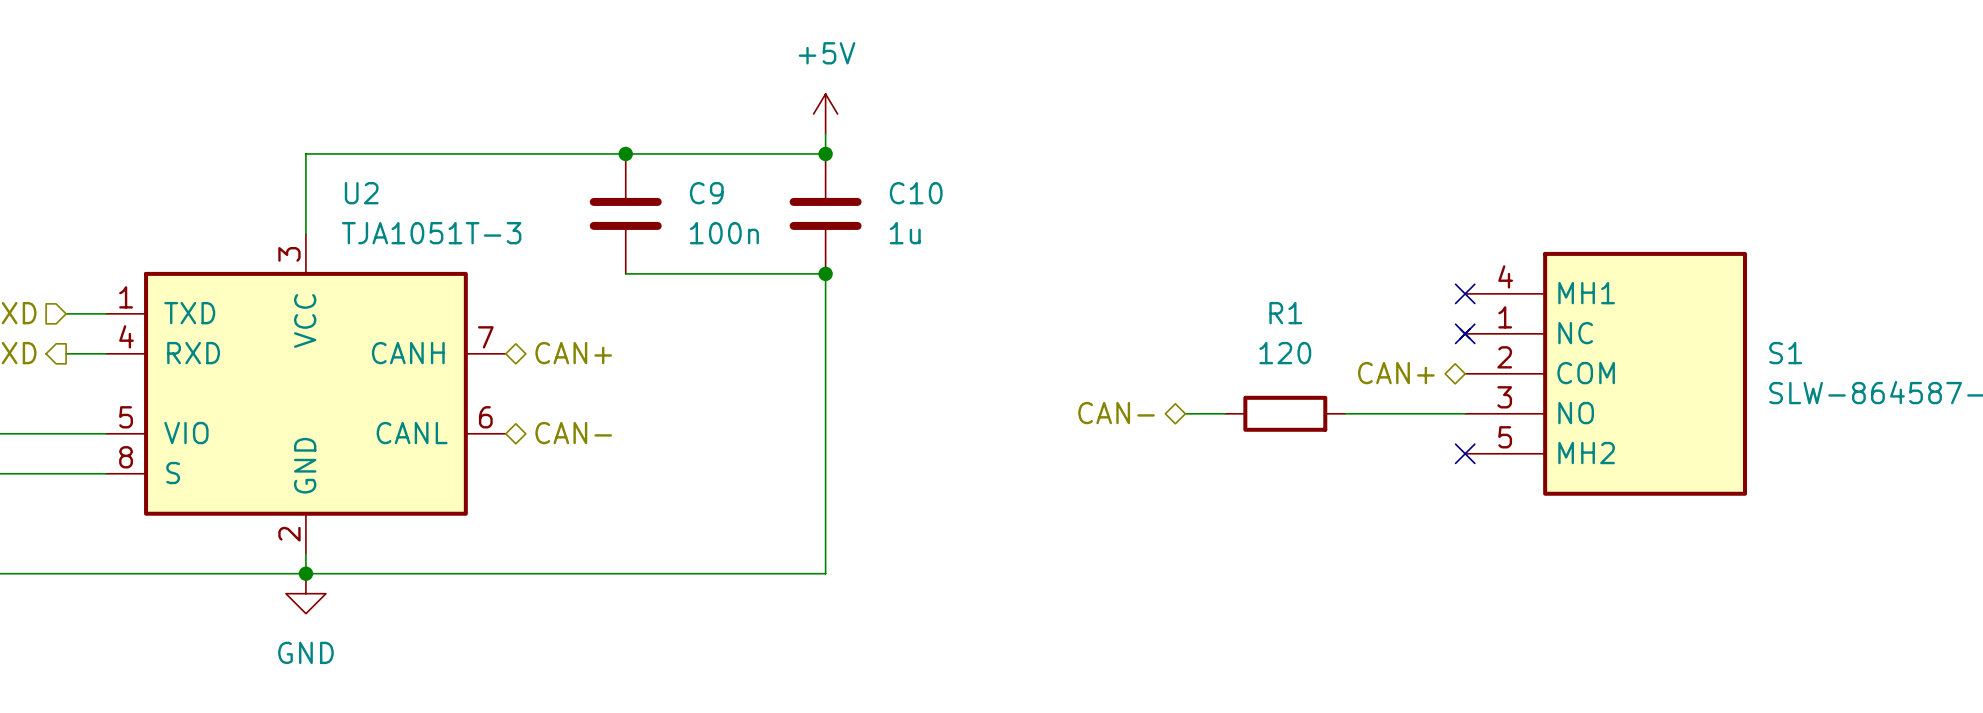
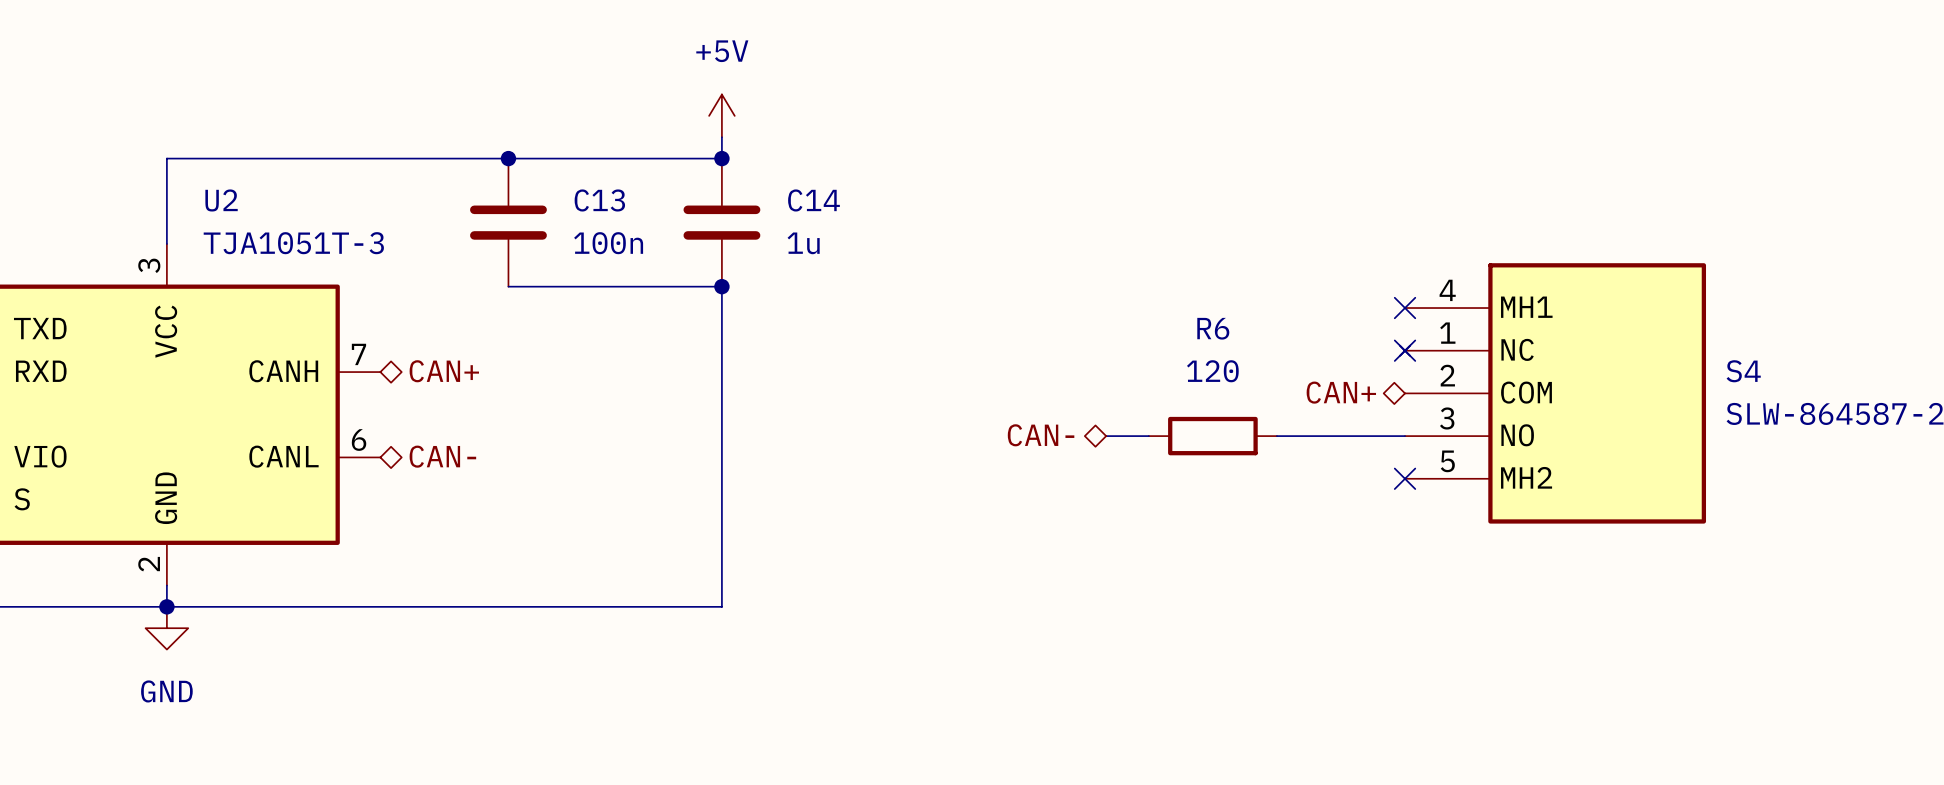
C9 name: C9 (706, 193) -> C13 (599, 200)
C10 name: C10 (916, 193) -> C14 (813, 200)
R1 name: R1 (1285, 313) -> R6 (1213, 328)
S1 name: S1 (1785, 353) -> S4 (1743, 371)

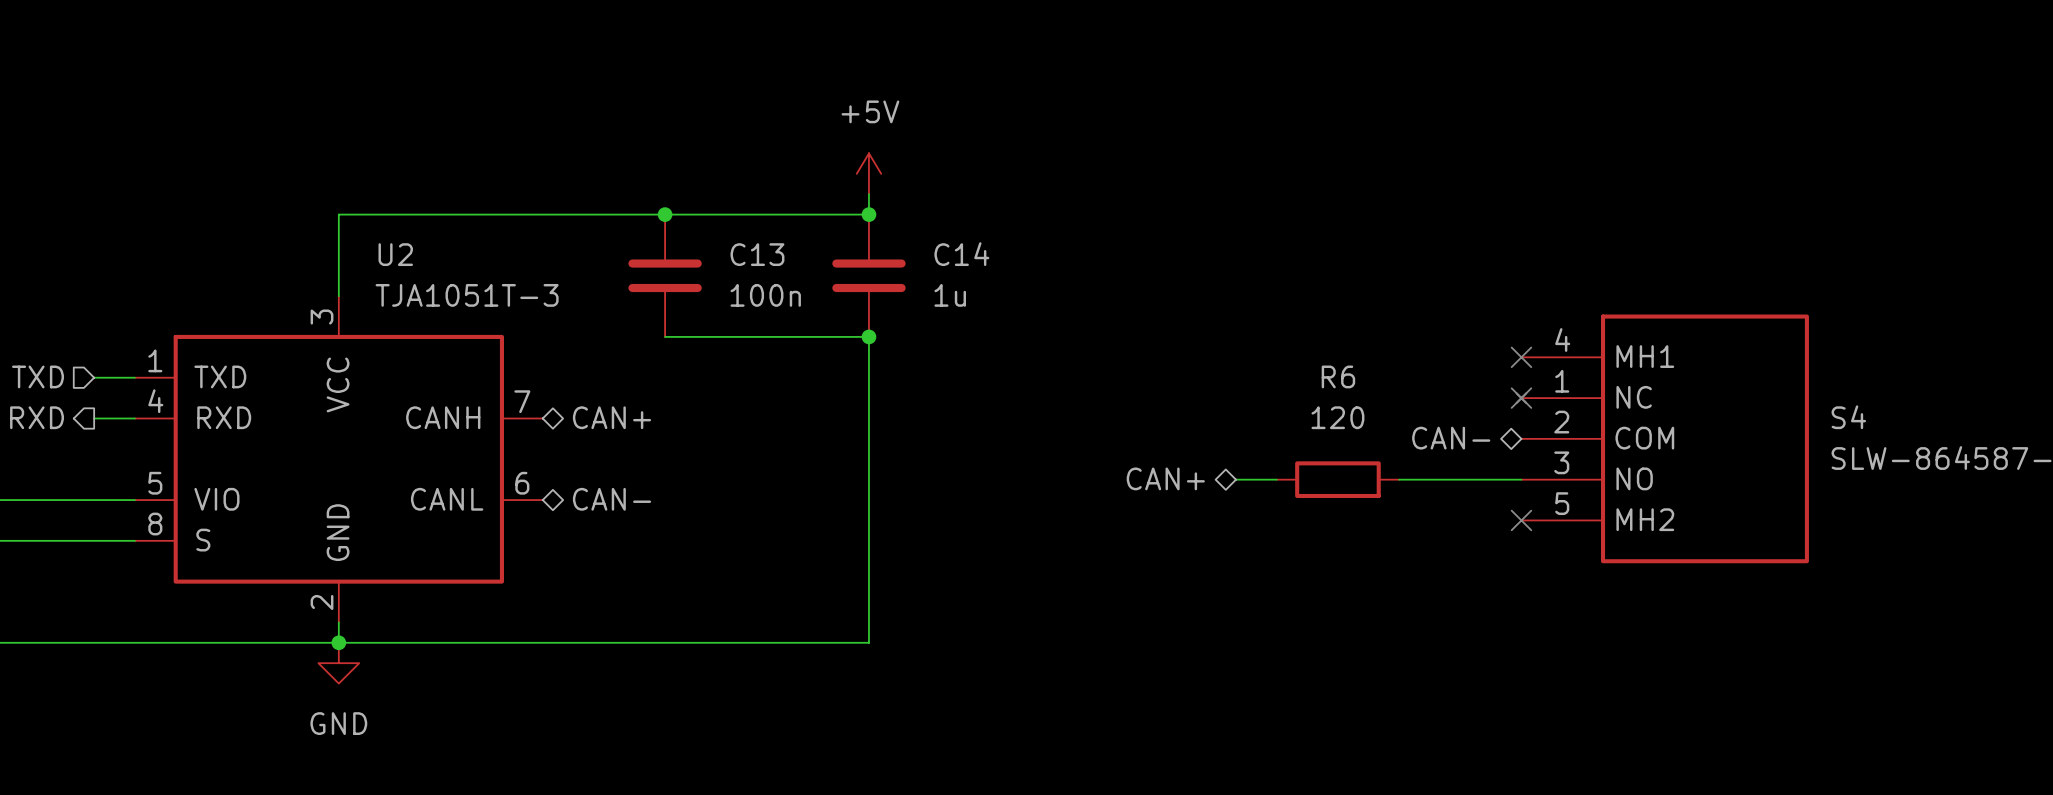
hierarchical label: CAN+ (1341, 392) -> CAN- (1451, 438)
hierarchical label: CAN- (1041, 435) -> CAN+ (1165, 478)

